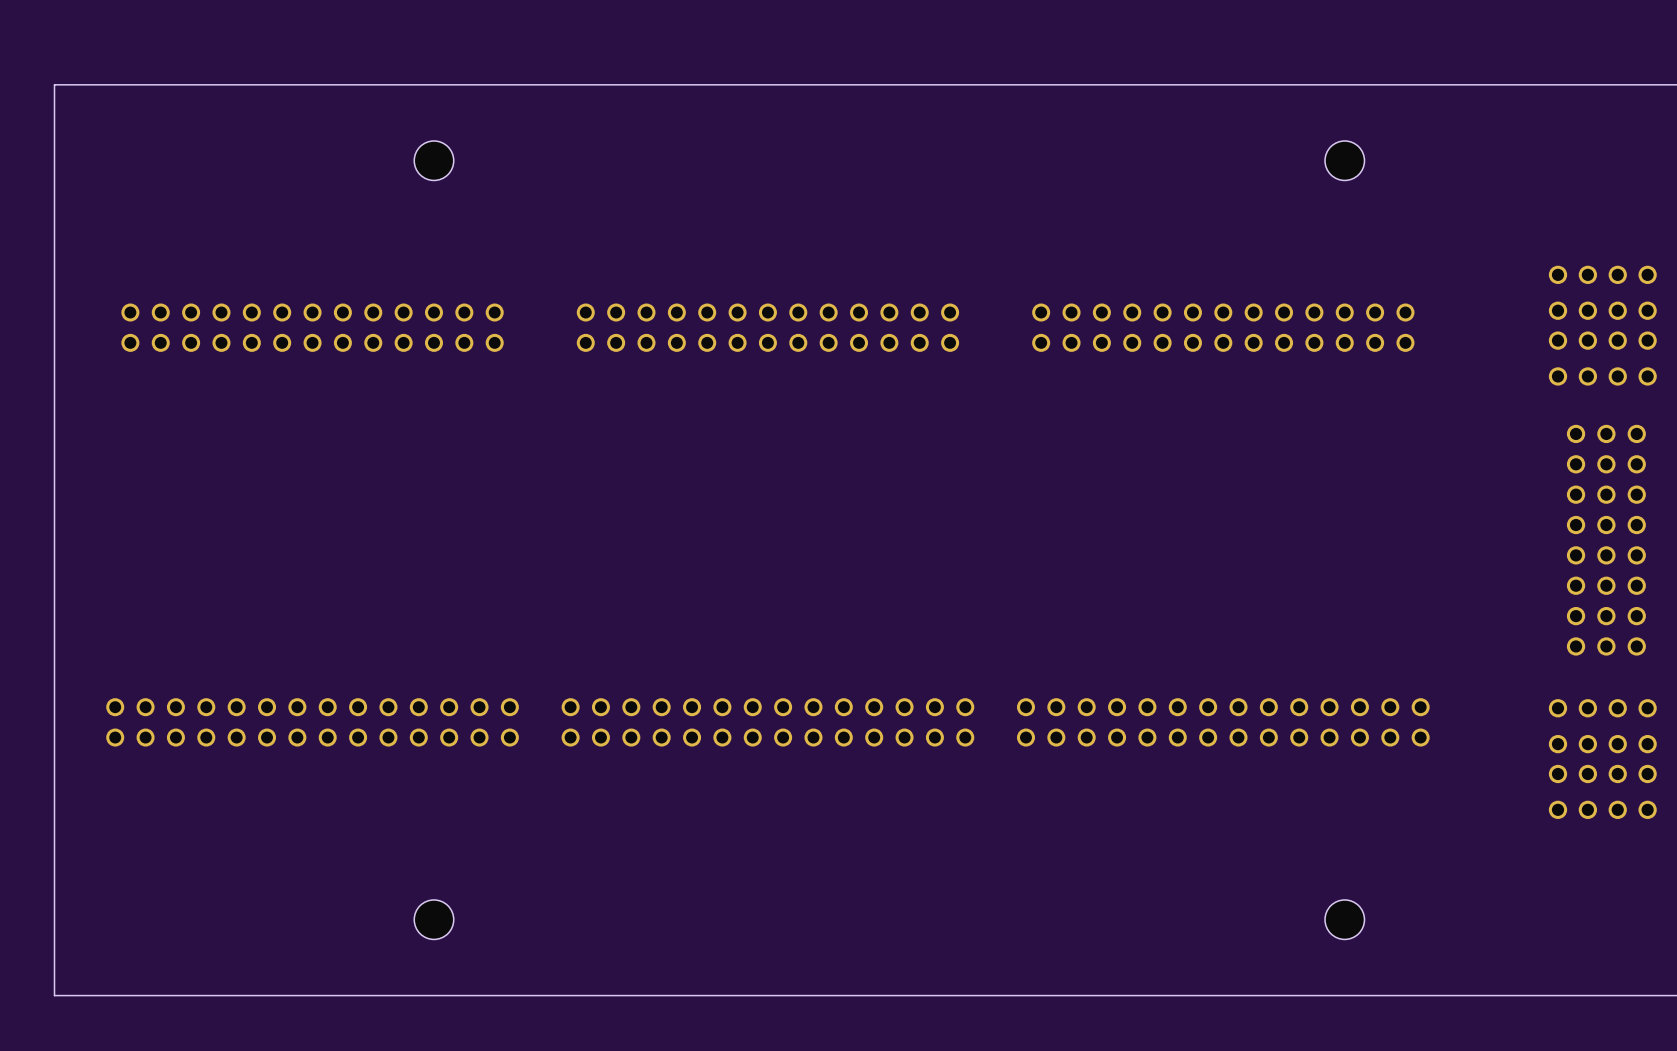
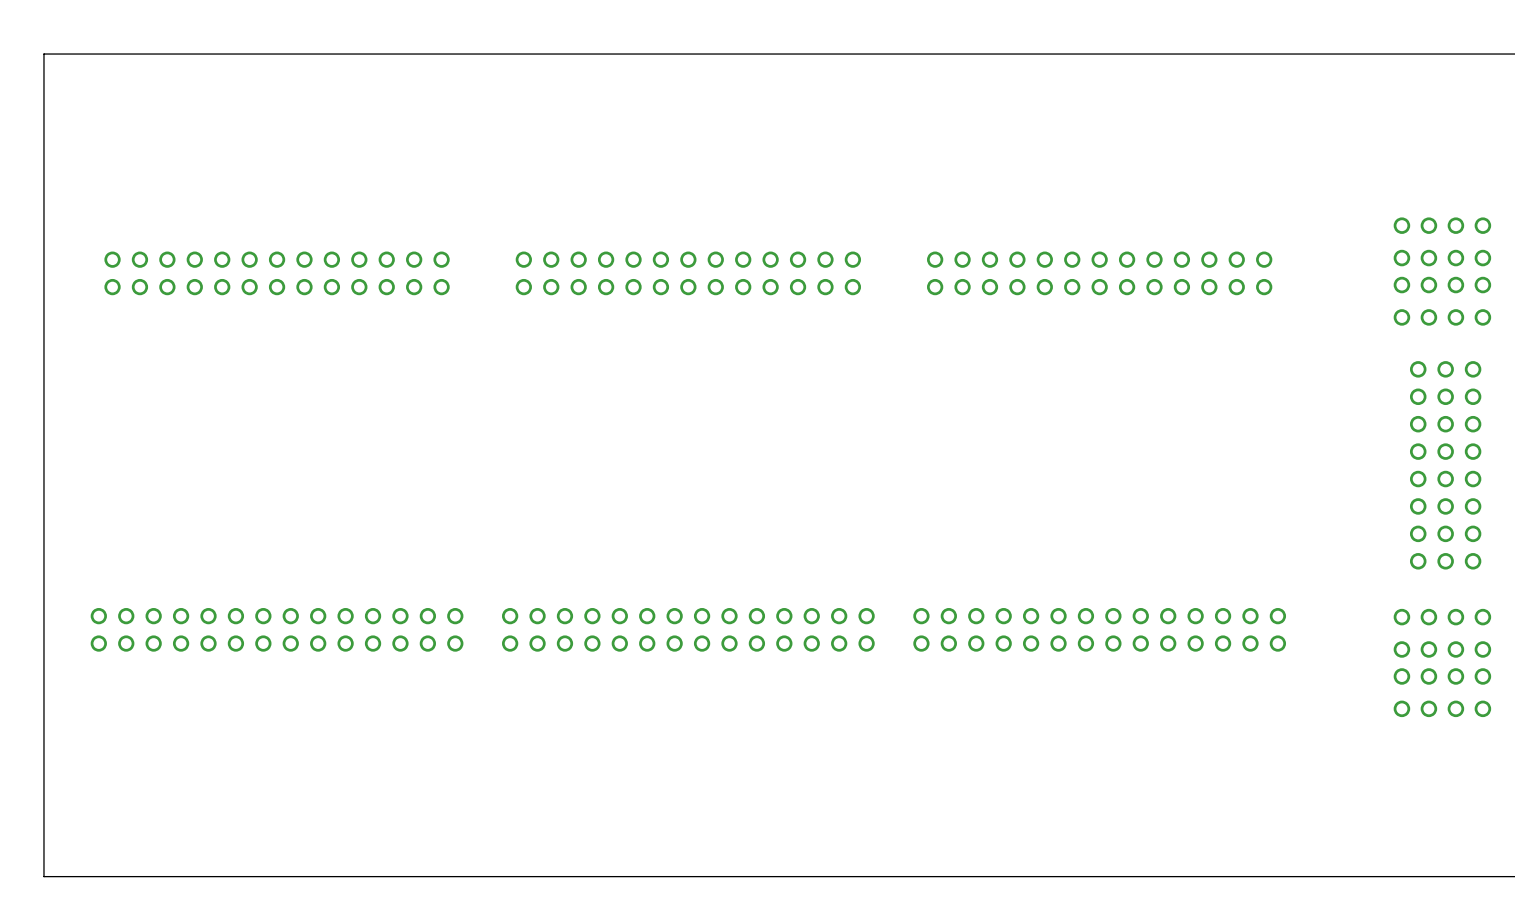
part: (433, 160) -> none
part: (1344, 160) -> none
part: (433, 919) -> none
part: (1344, 919) -> none

